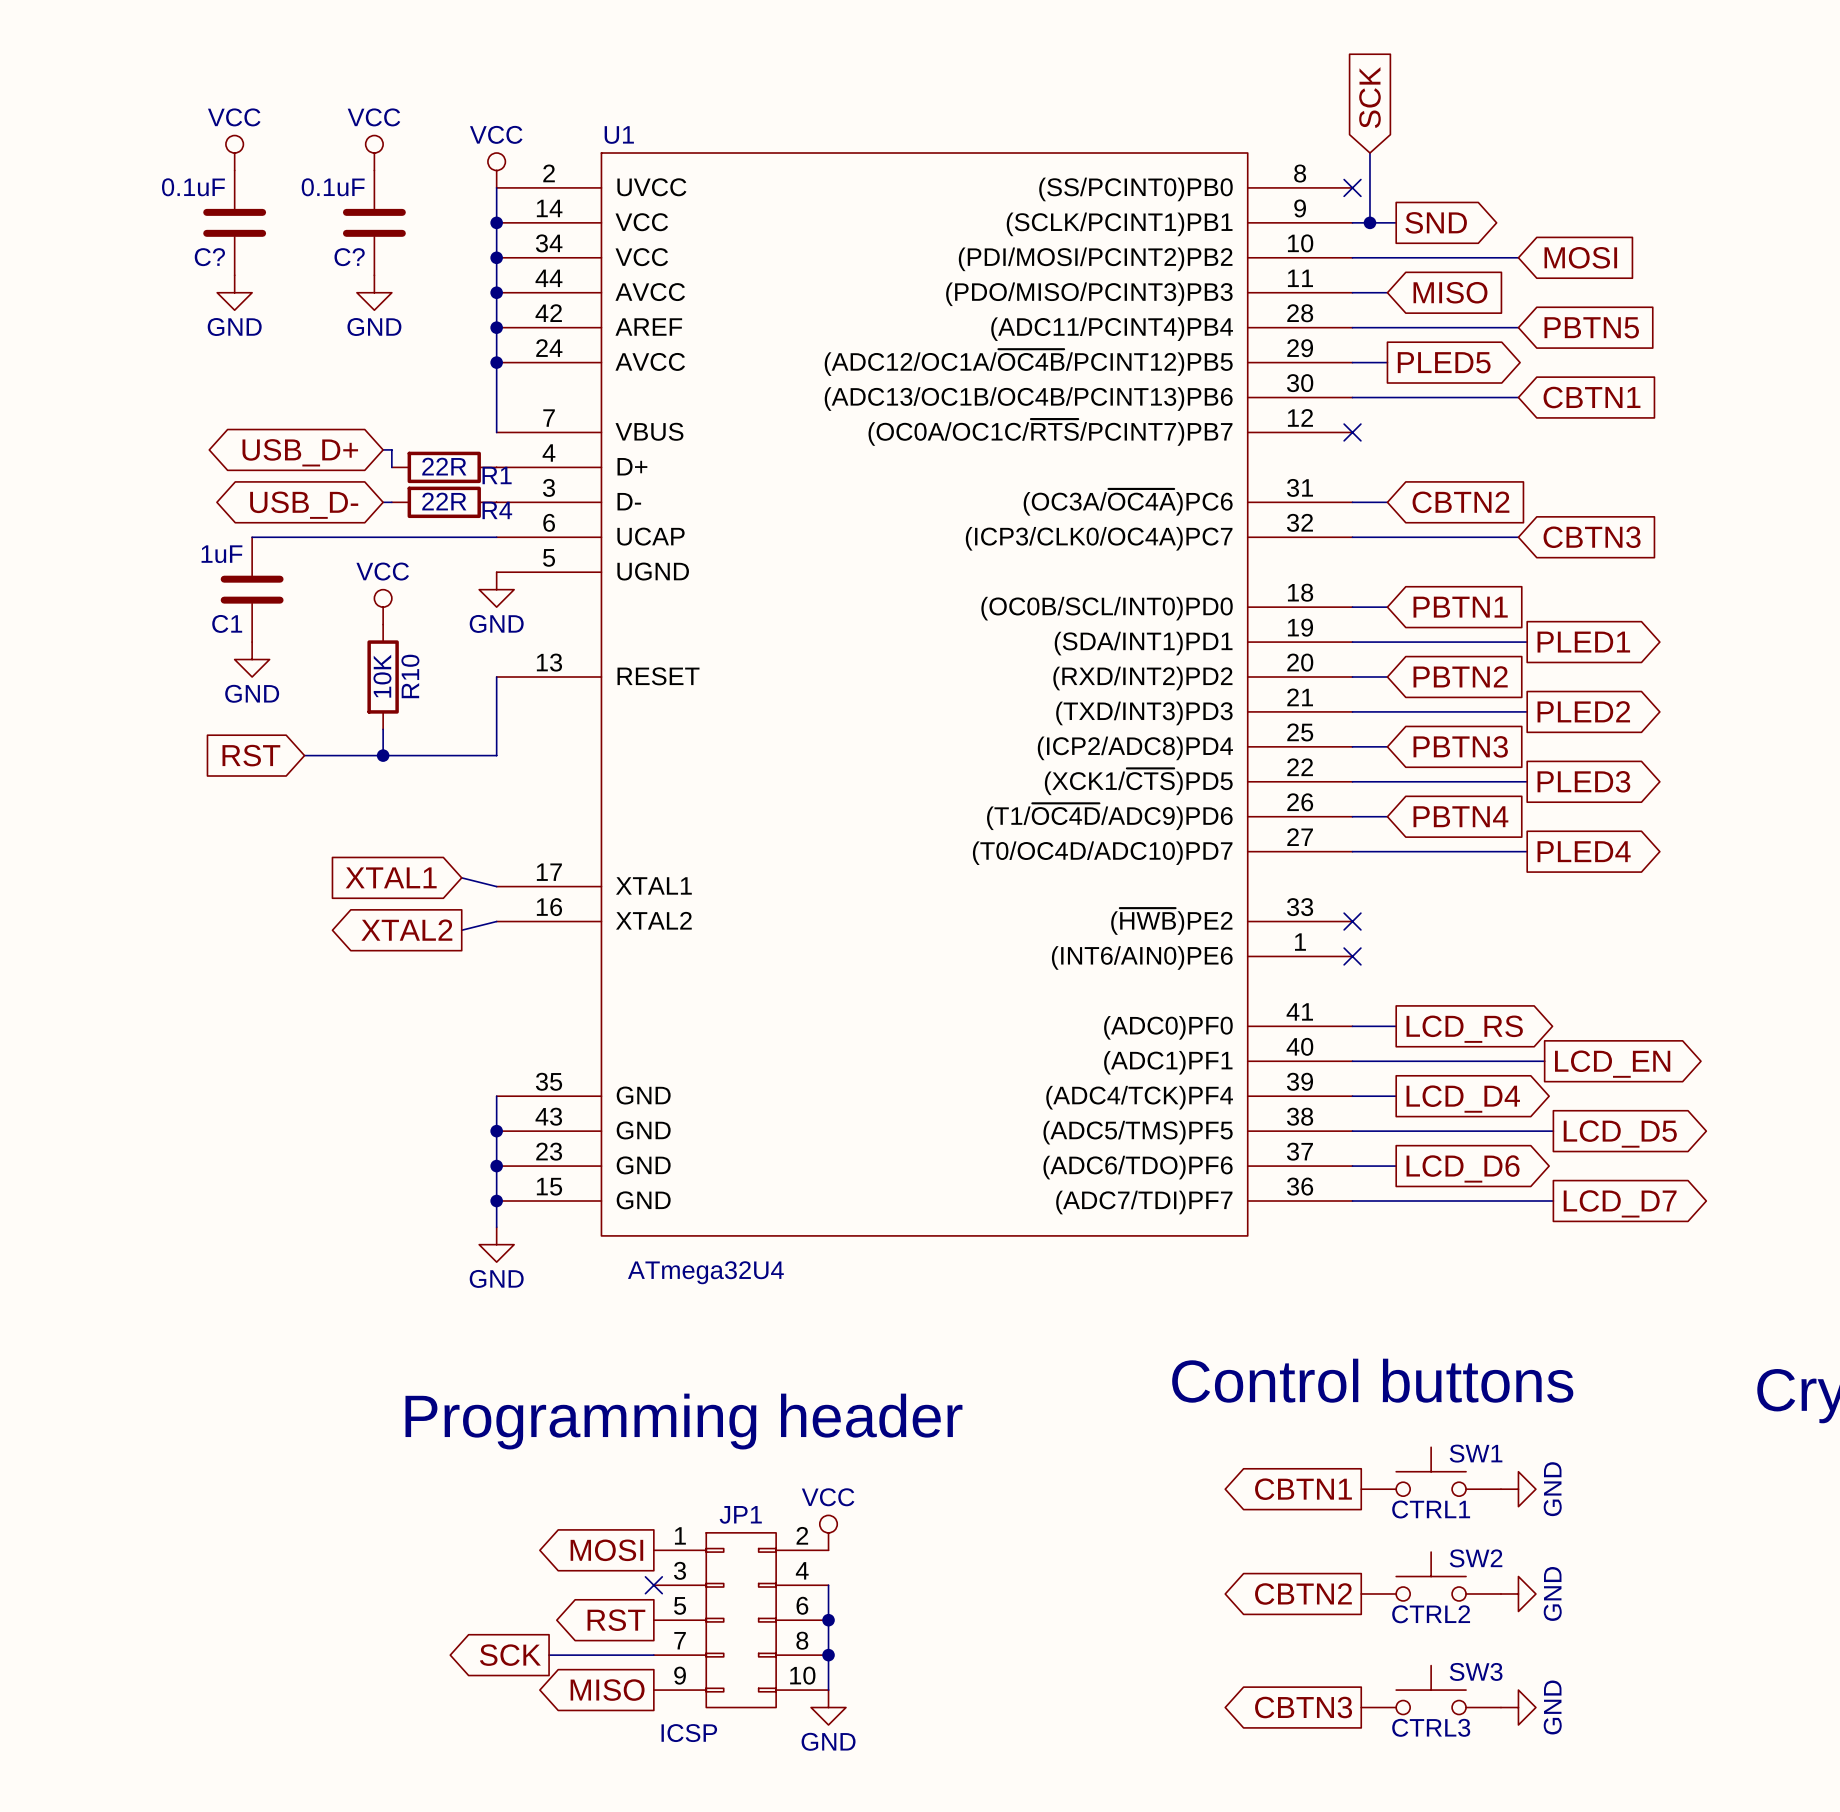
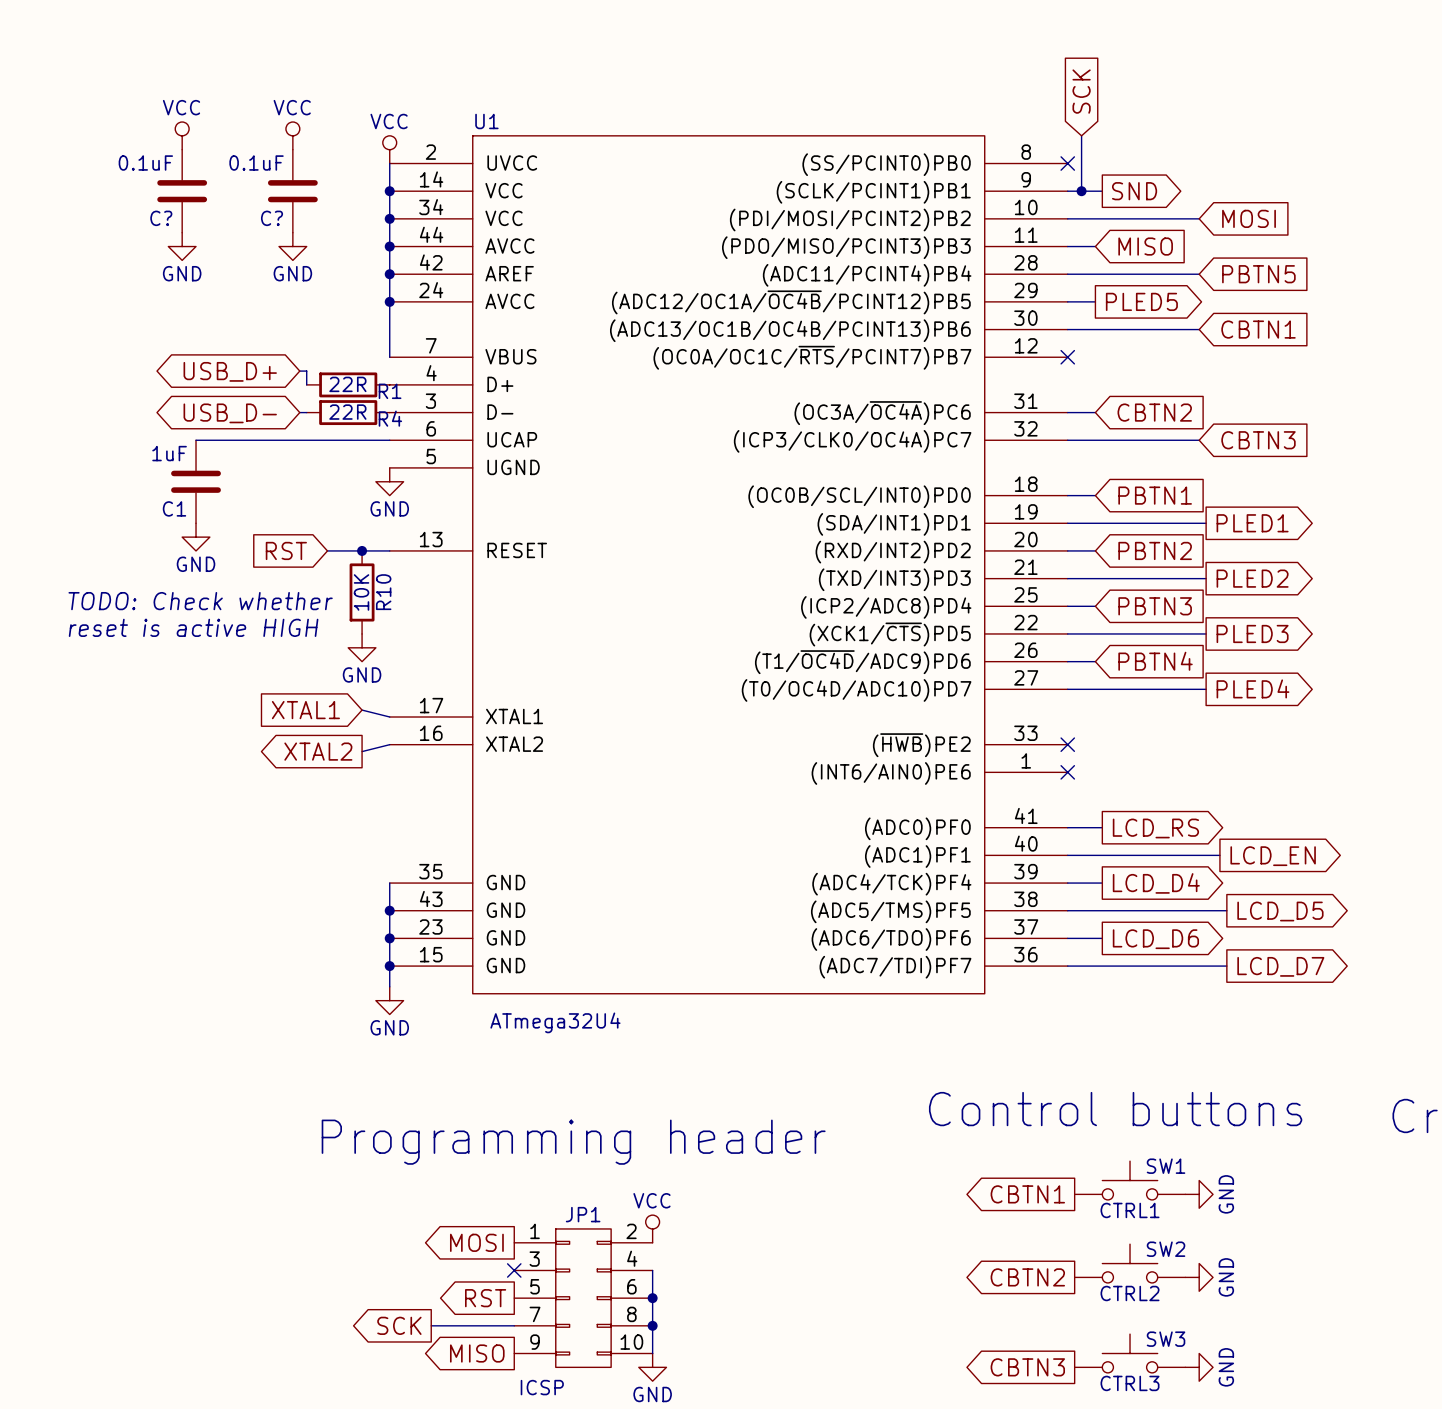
power symbol: VCC (383, 607) -> none
R10 position: (383, 677) -> (362, 592)
junction: none -> (362, 550)
wire: (496, 677) (496, 755) (304, 755) -> (389, 550) (327, 550)
wire: (383, 729) (383, 755) -> none
text: none -> TODO: Check whether (200, 601)
global label position: RST (251, 755) -> RST (286, 550)
junction: (383, 755) -> none
text: none -> reset is active HIGH (193, 627)
power symbol: none -> GND (362, 647)

